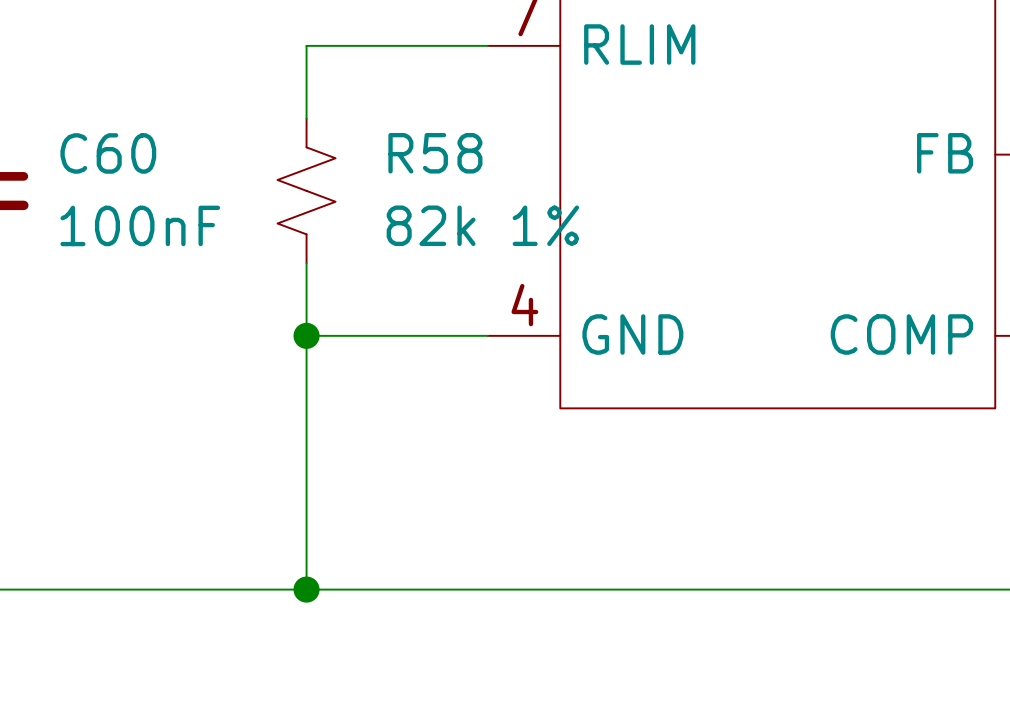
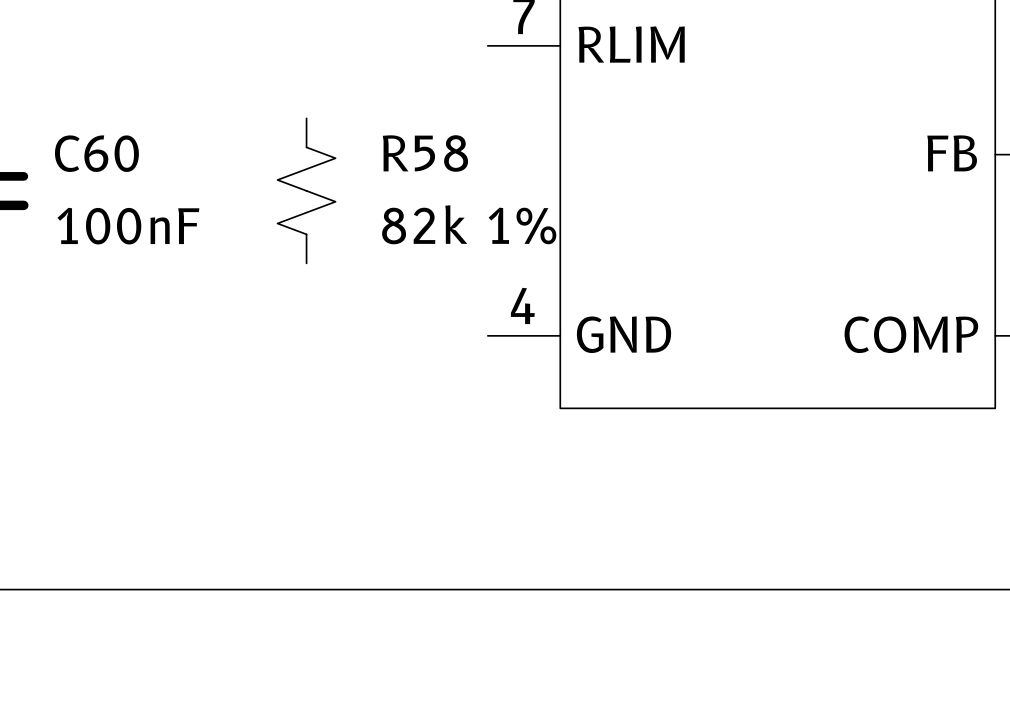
wire: (487, 45) (306, 45) (306, 118) -> none
wire: (306, 263) (306, 589) -> none
wire: (306, 335) (487, 335) -> none
junction: (306, 335) -> none
junction: (306, 589) -> none

